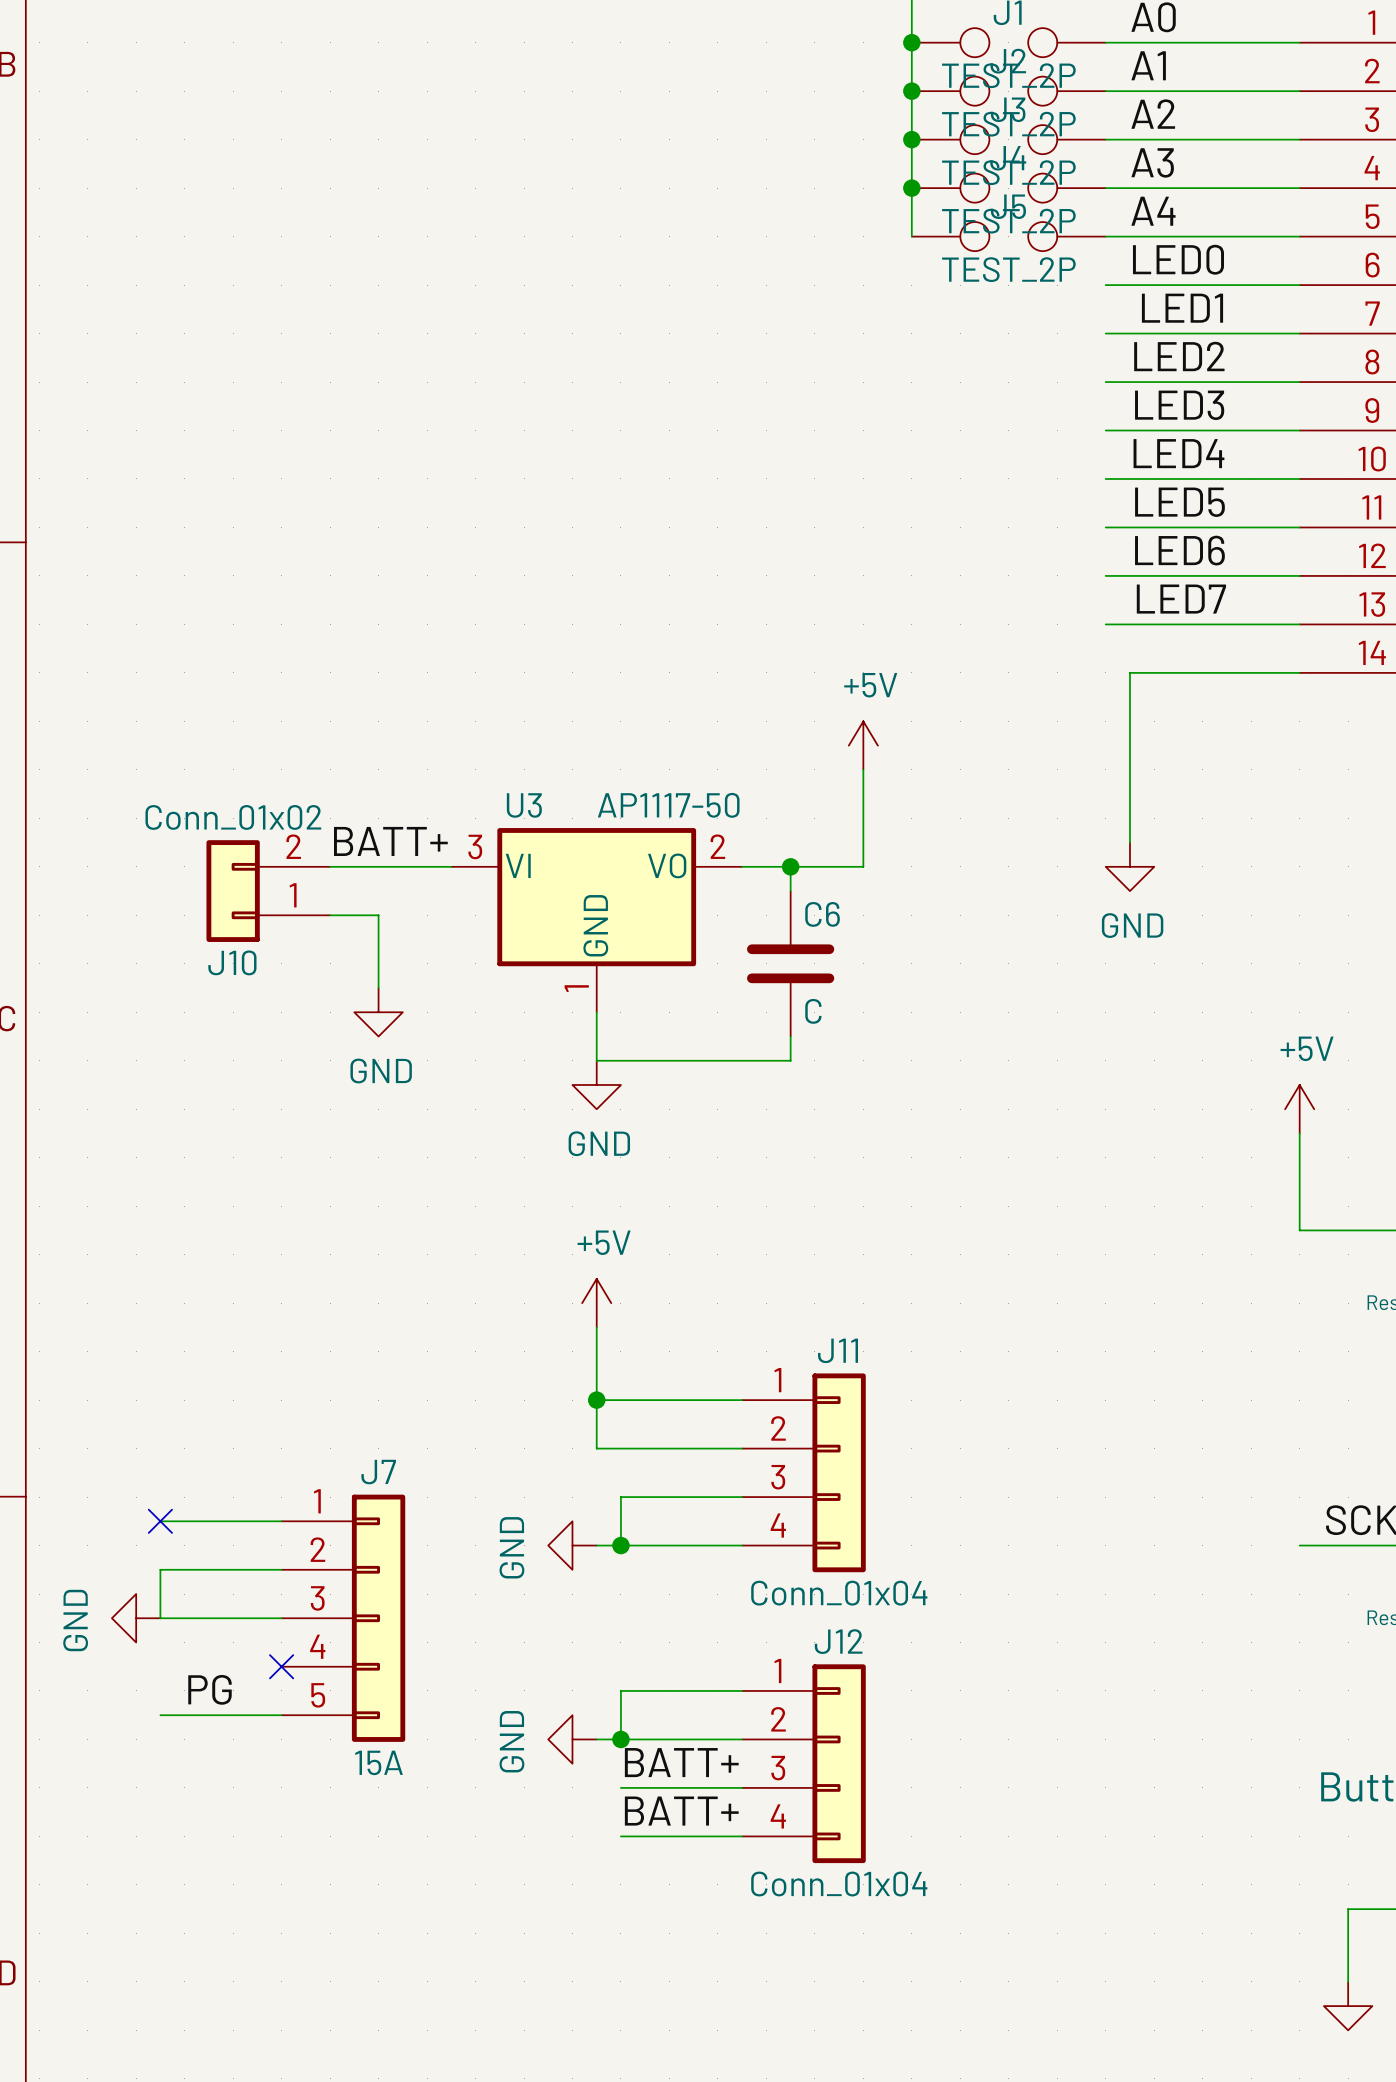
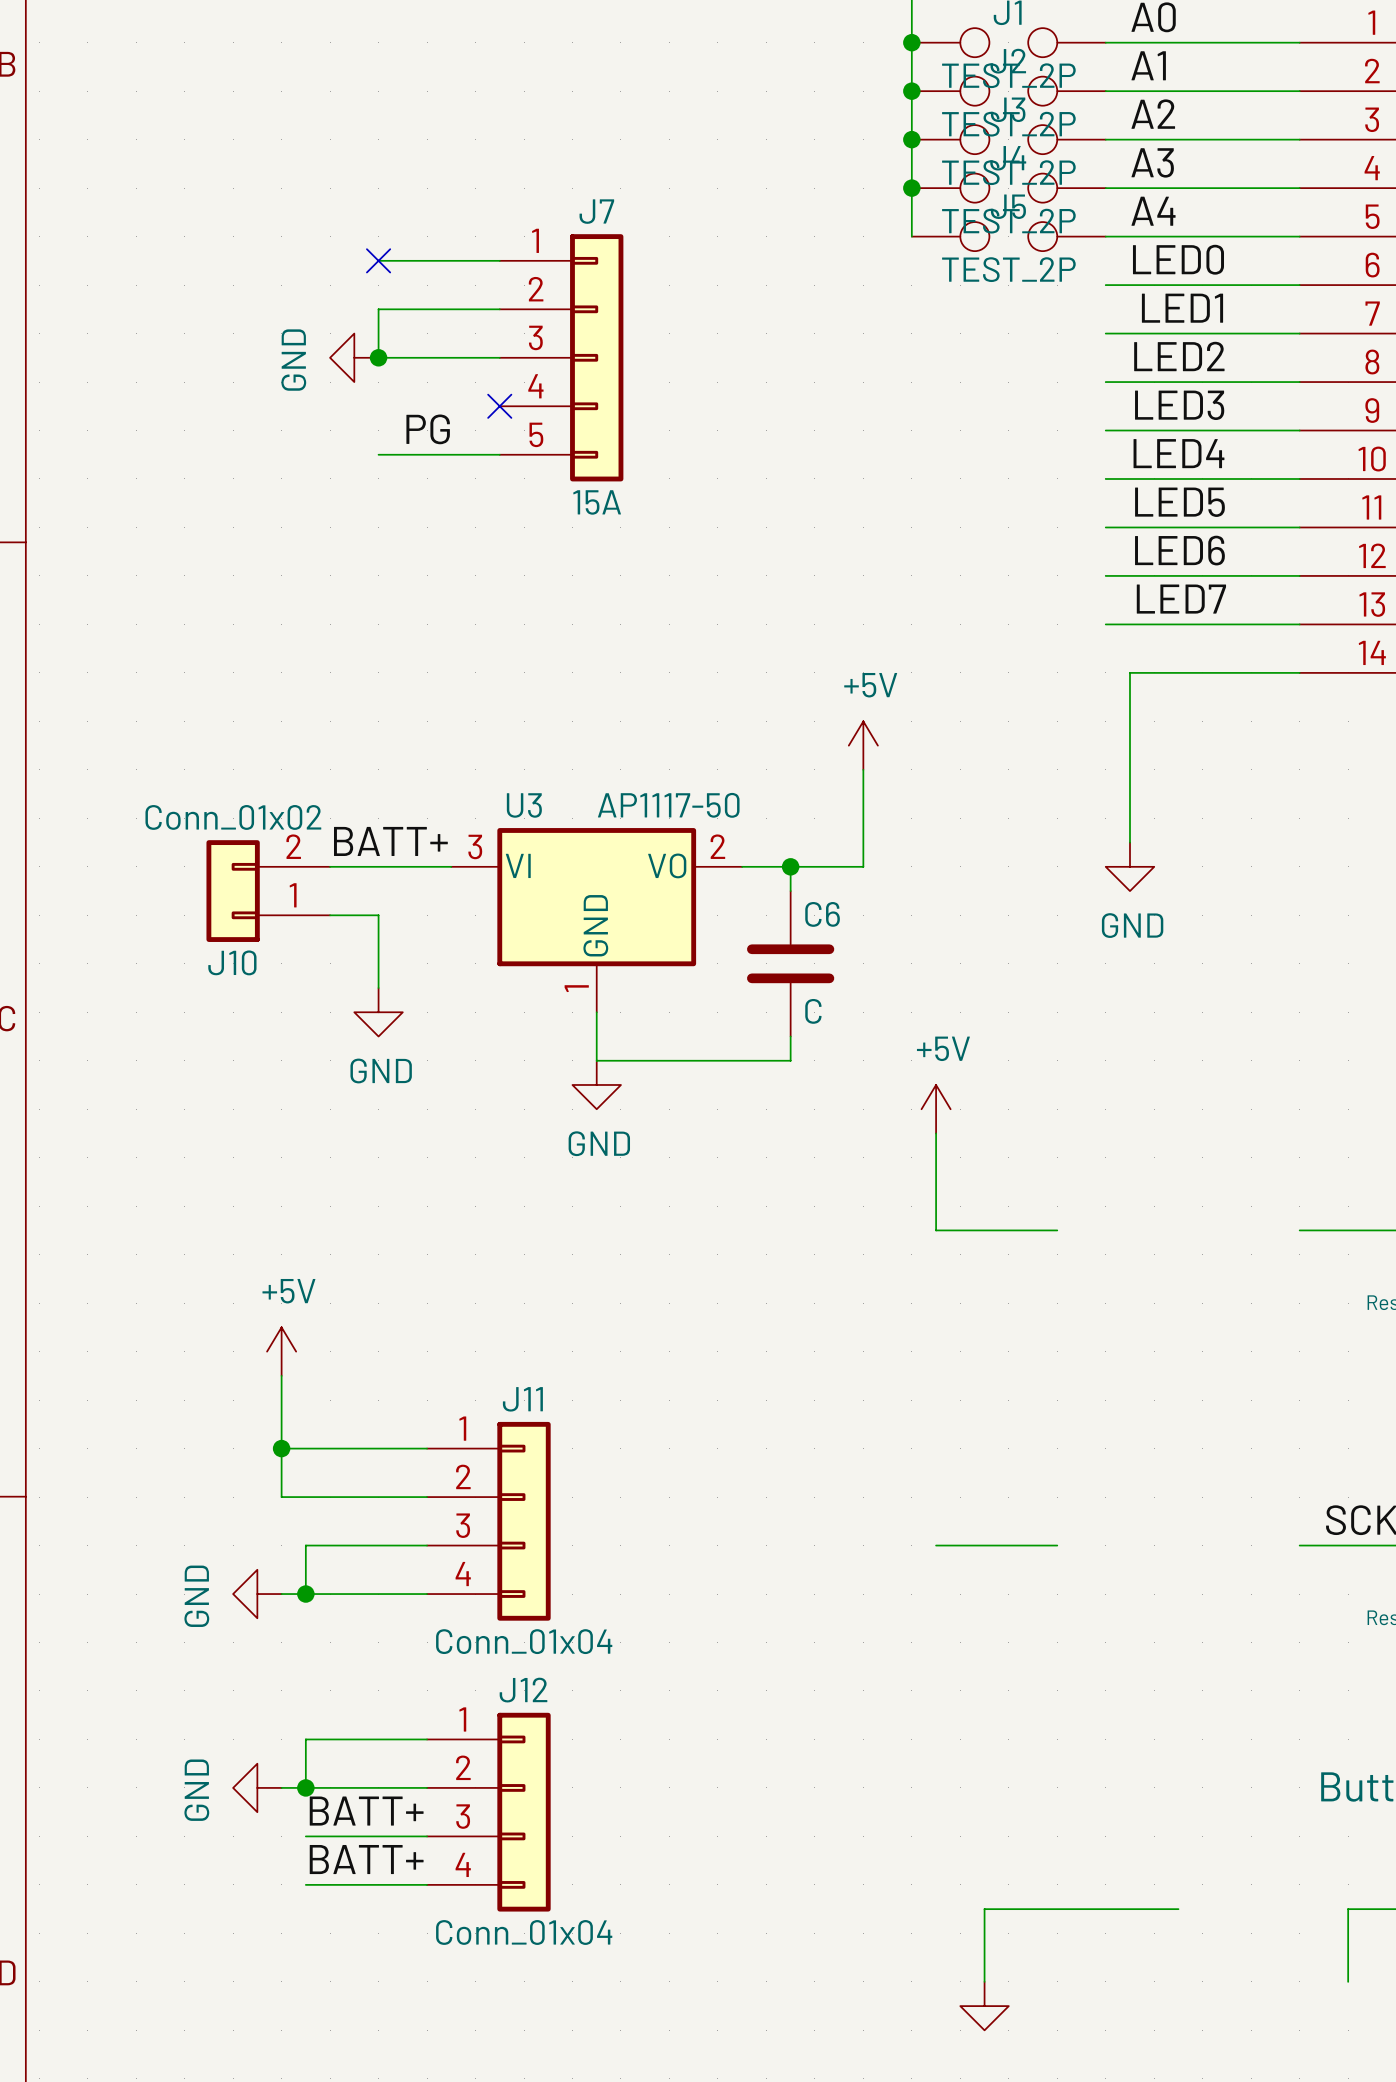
wire: none -> (378, 260) (499, 260)
no-connect mark: none -> (378, 260)
wire: none -> (499, 309) (378, 309) (378, 357) (499, 357)
power symbol: none -> GND (354, 357)
junction: none -> (378, 357)
no-connect mark: none -> (499, 406)
label: none -> PG (428, 429)
wire: none -> (378, 454) (499, 454)
power symbol: none -> +5V (936, 1109)
power symbol: +5V (1299, 1109) -> none
wire: none -> (936, 1133) (936, 1230) (1057, 1230)
wire: (1299, 1133) (1299, 1230) -> none
power symbol: +5V (596, 1303) -> none
wire: (596, 1327) (596, 1448) (742, 1448) -> (281, 1375) (281, 1497) (427, 1497)
power symbol: none -> +5V (281, 1351)
wire: (596, 1400) (742, 1400) -> (281, 1448) (427, 1448)
junction: (596, 1400) -> none
junction: none -> (281, 1448)
J11 position: (803, 1472) -> (488, 1521)
wire: (742, 1497) (620, 1497) (620, 1545) -> (427, 1545) (305, 1545) (305, 1594)
wire: (160, 1521) (281, 1521) -> none
no-connect mark: (160, 1521) -> none
power symbol: GND (572, 1545) -> none
wire: (596, 1545) (742, 1545) -> (281, 1594) (427, 1594)
junction: (620, 1545) -> none
wire: none -> (936, 1545) (1057, 1545)
wire: (281, 1569) (160, 1569) (160, 1618) (281, 1618) -> none
power symbol: none -> GND (257, 1594)
junction: none -> (305, 1594)
power symbol: GND (136, 1618) -> none
J7 position: (343, 1618) -> (561, 357)
no-connect mark: (281, 1666) -> none
label: PG (209, 1689) -> none
wire: (742, 1690) (620, 1690) (620, 1739) -> (427, 1739) (305, 1739) (305, 1787)
wire: (160, 1715) (281, 1715) -> none
power symbol: GND (572, 1739) -> none
wire: (596, 1739) (742, 1739) -> (281, 1787) (427, 1787)
junction: (620, 1739) -> none
label: BATT+ (681, 1762) -> none
J12 position: (803, 1763) -> (488, 1812)
power symbol: none -> GND (257, 1787)
junction: none -> (305, 1787)
wire: (620, 1787) (742, 1787) -> (305, 1836) (427, 1836)
label: none -> BATT+ (366, 1811)
label: BATT+ (681, 1811) -> none
wire: (620, 1836) (742, 1836) -> (305, 1884) (427, 1884)
label: none -> BATT+ (366, 1859)
wire: none -> (1178, 1909) (984, 1909) (984, 1981)
power symbol: none -> (984, 2006)
power symbol: (1348, 2006) -> none

